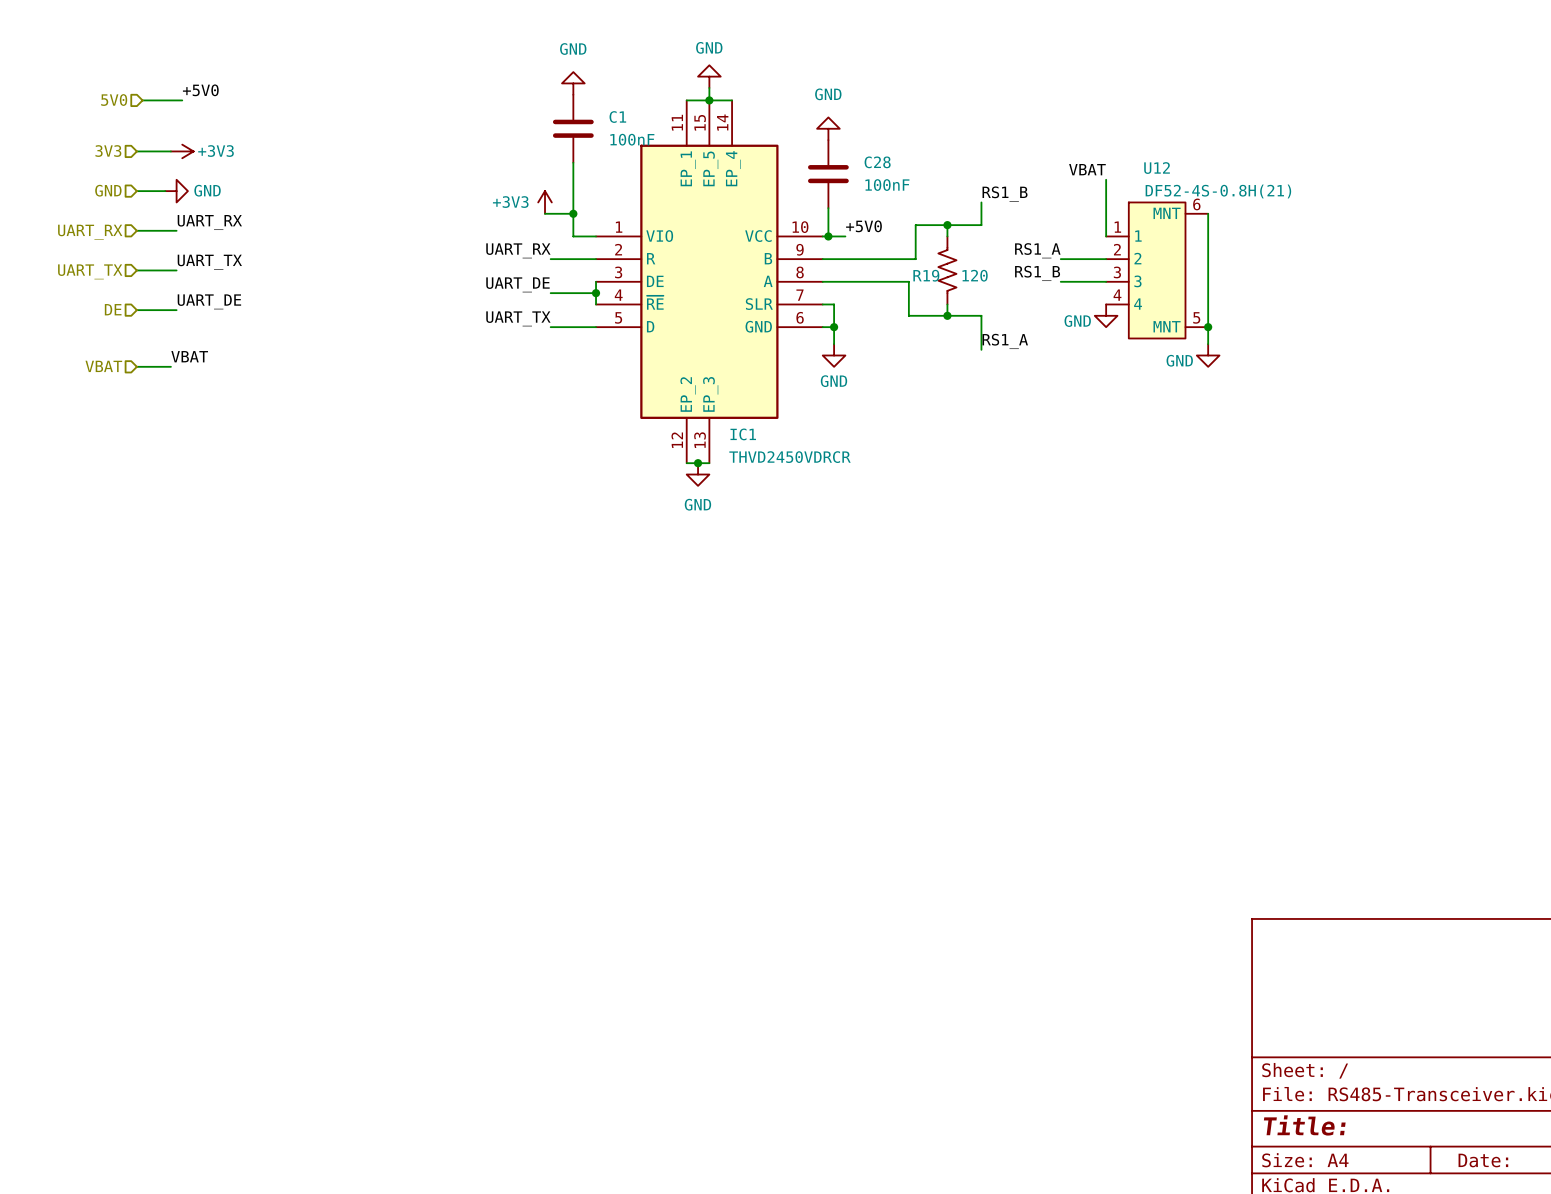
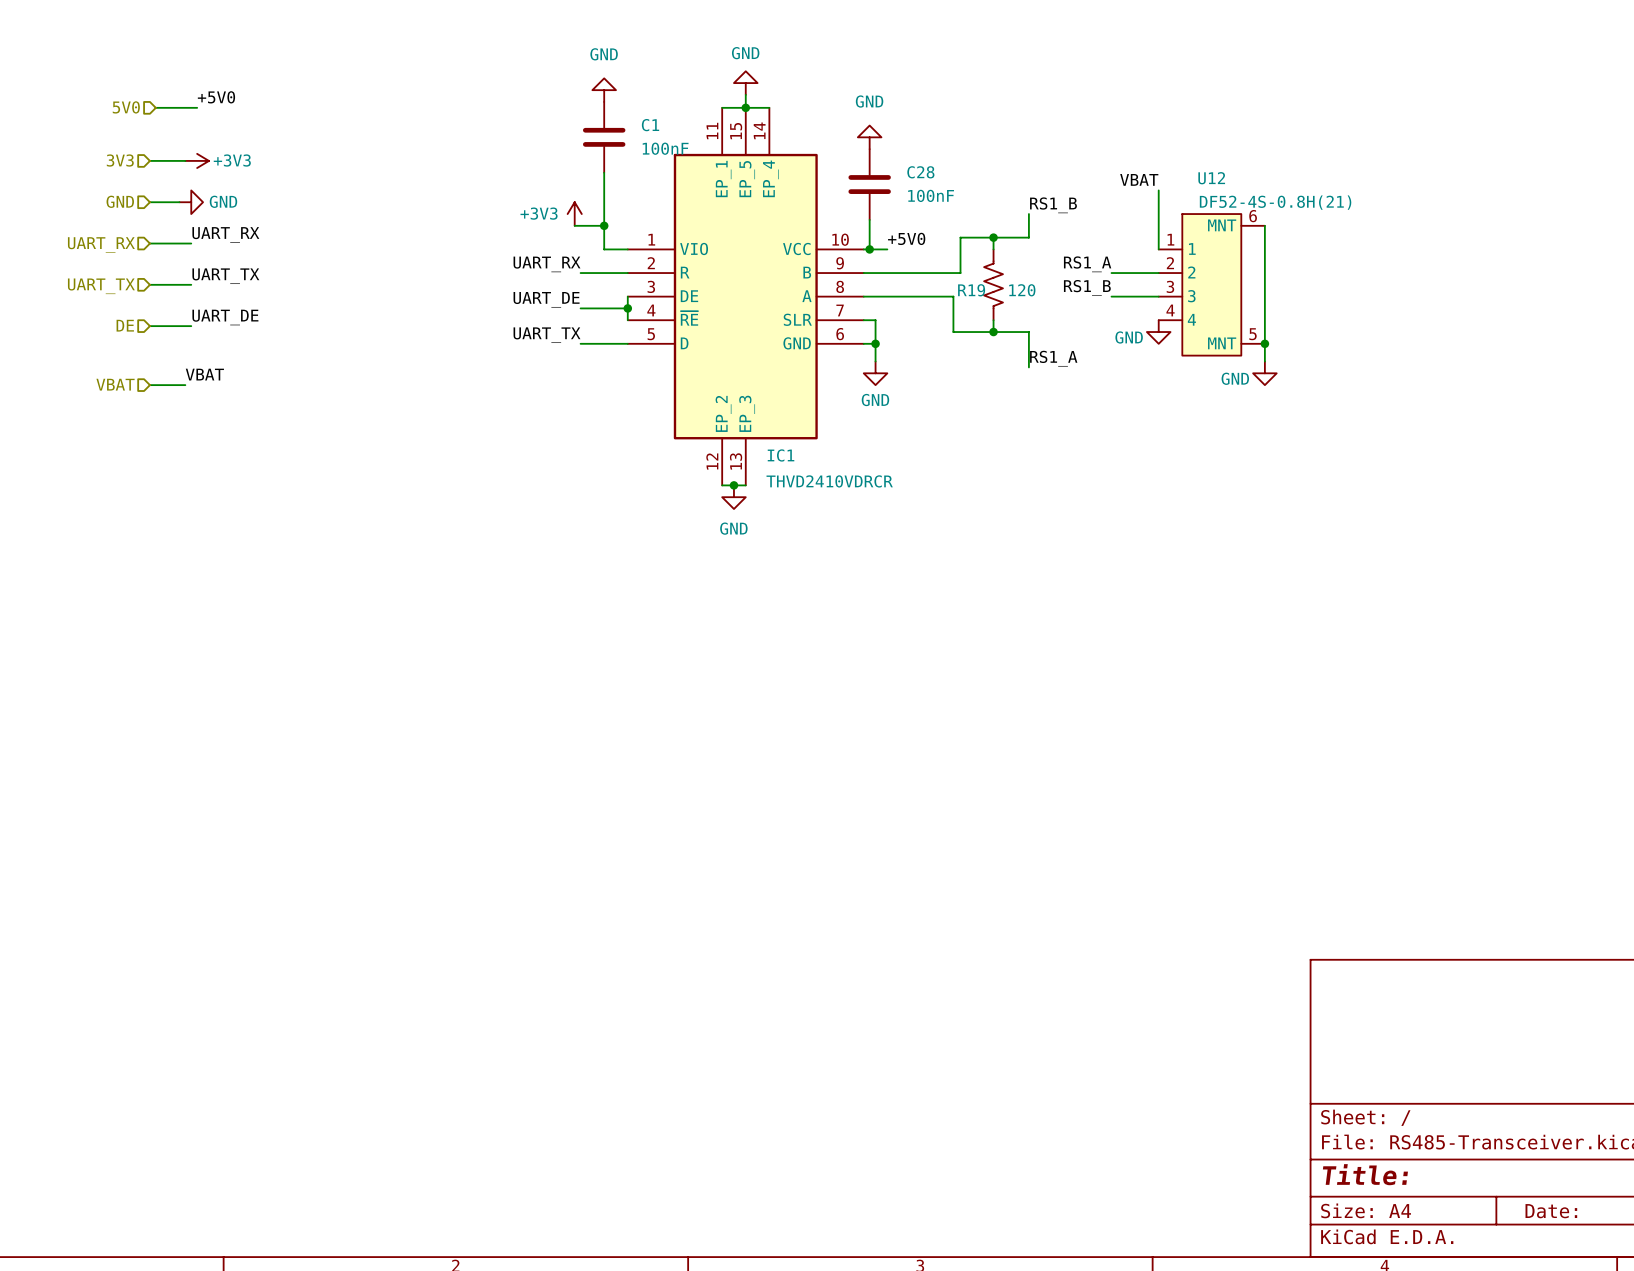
IC1 value: THVD2450VDRCR (789, 457) -> THVD2410VDRCR (829, 481)

